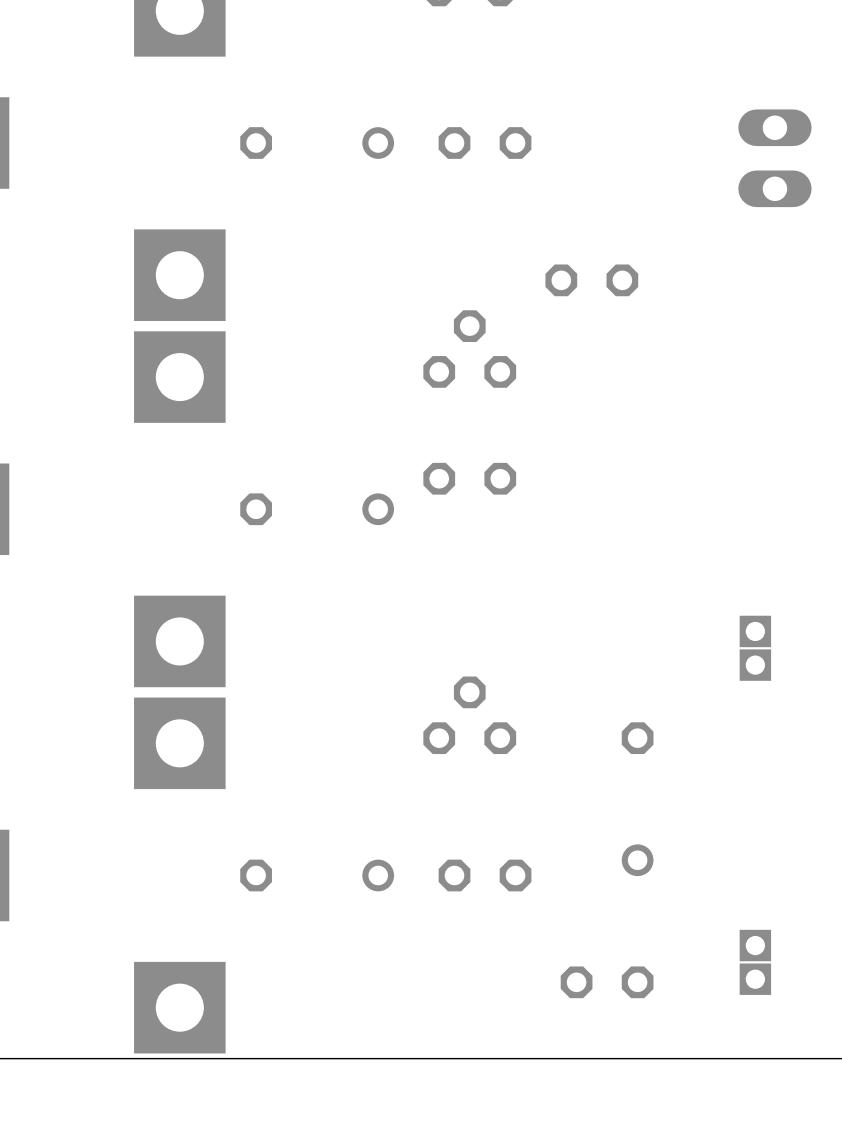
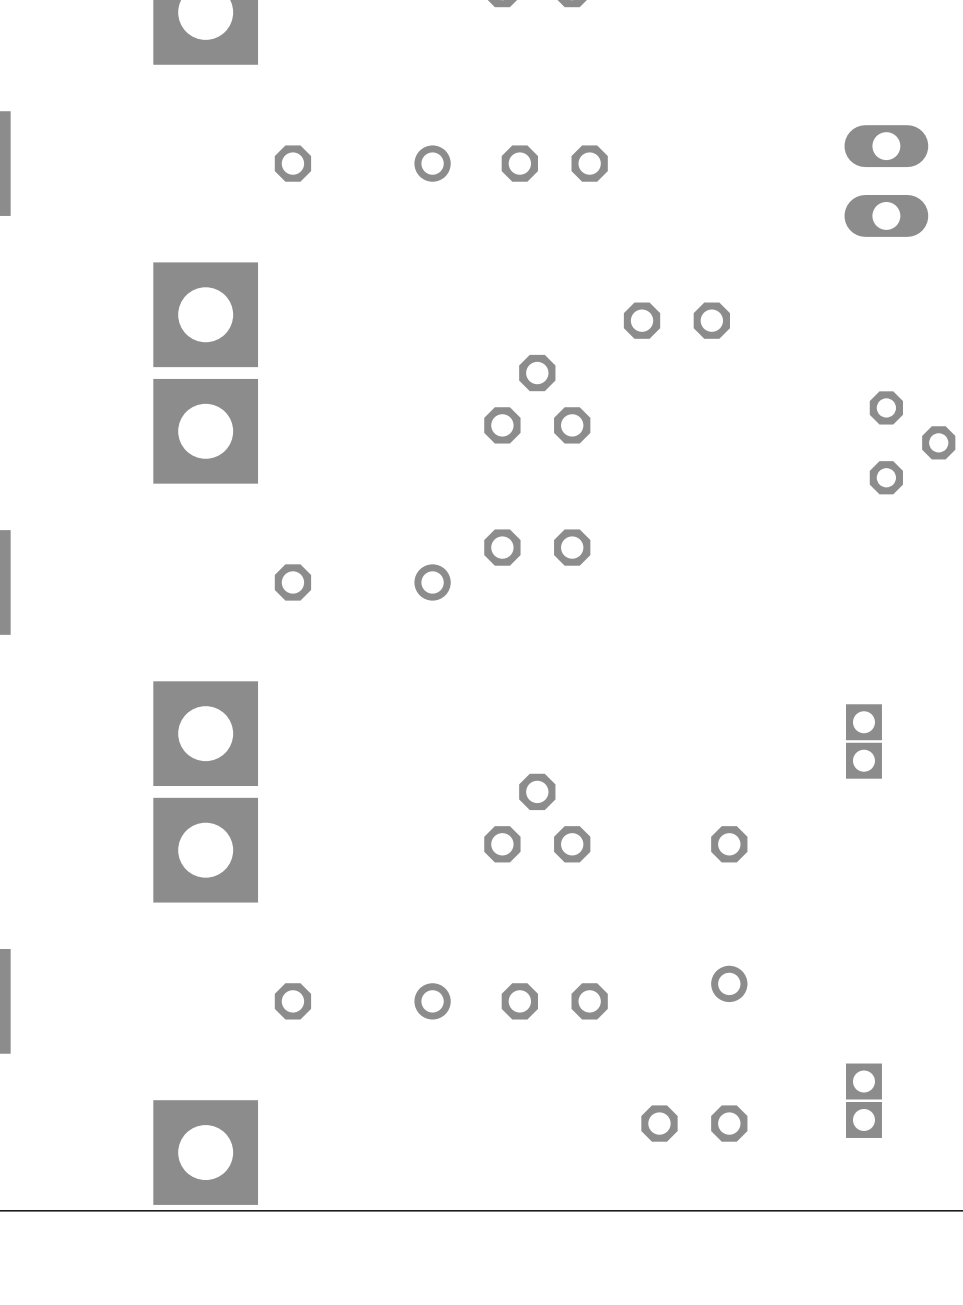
part: none -> (912, 442)

